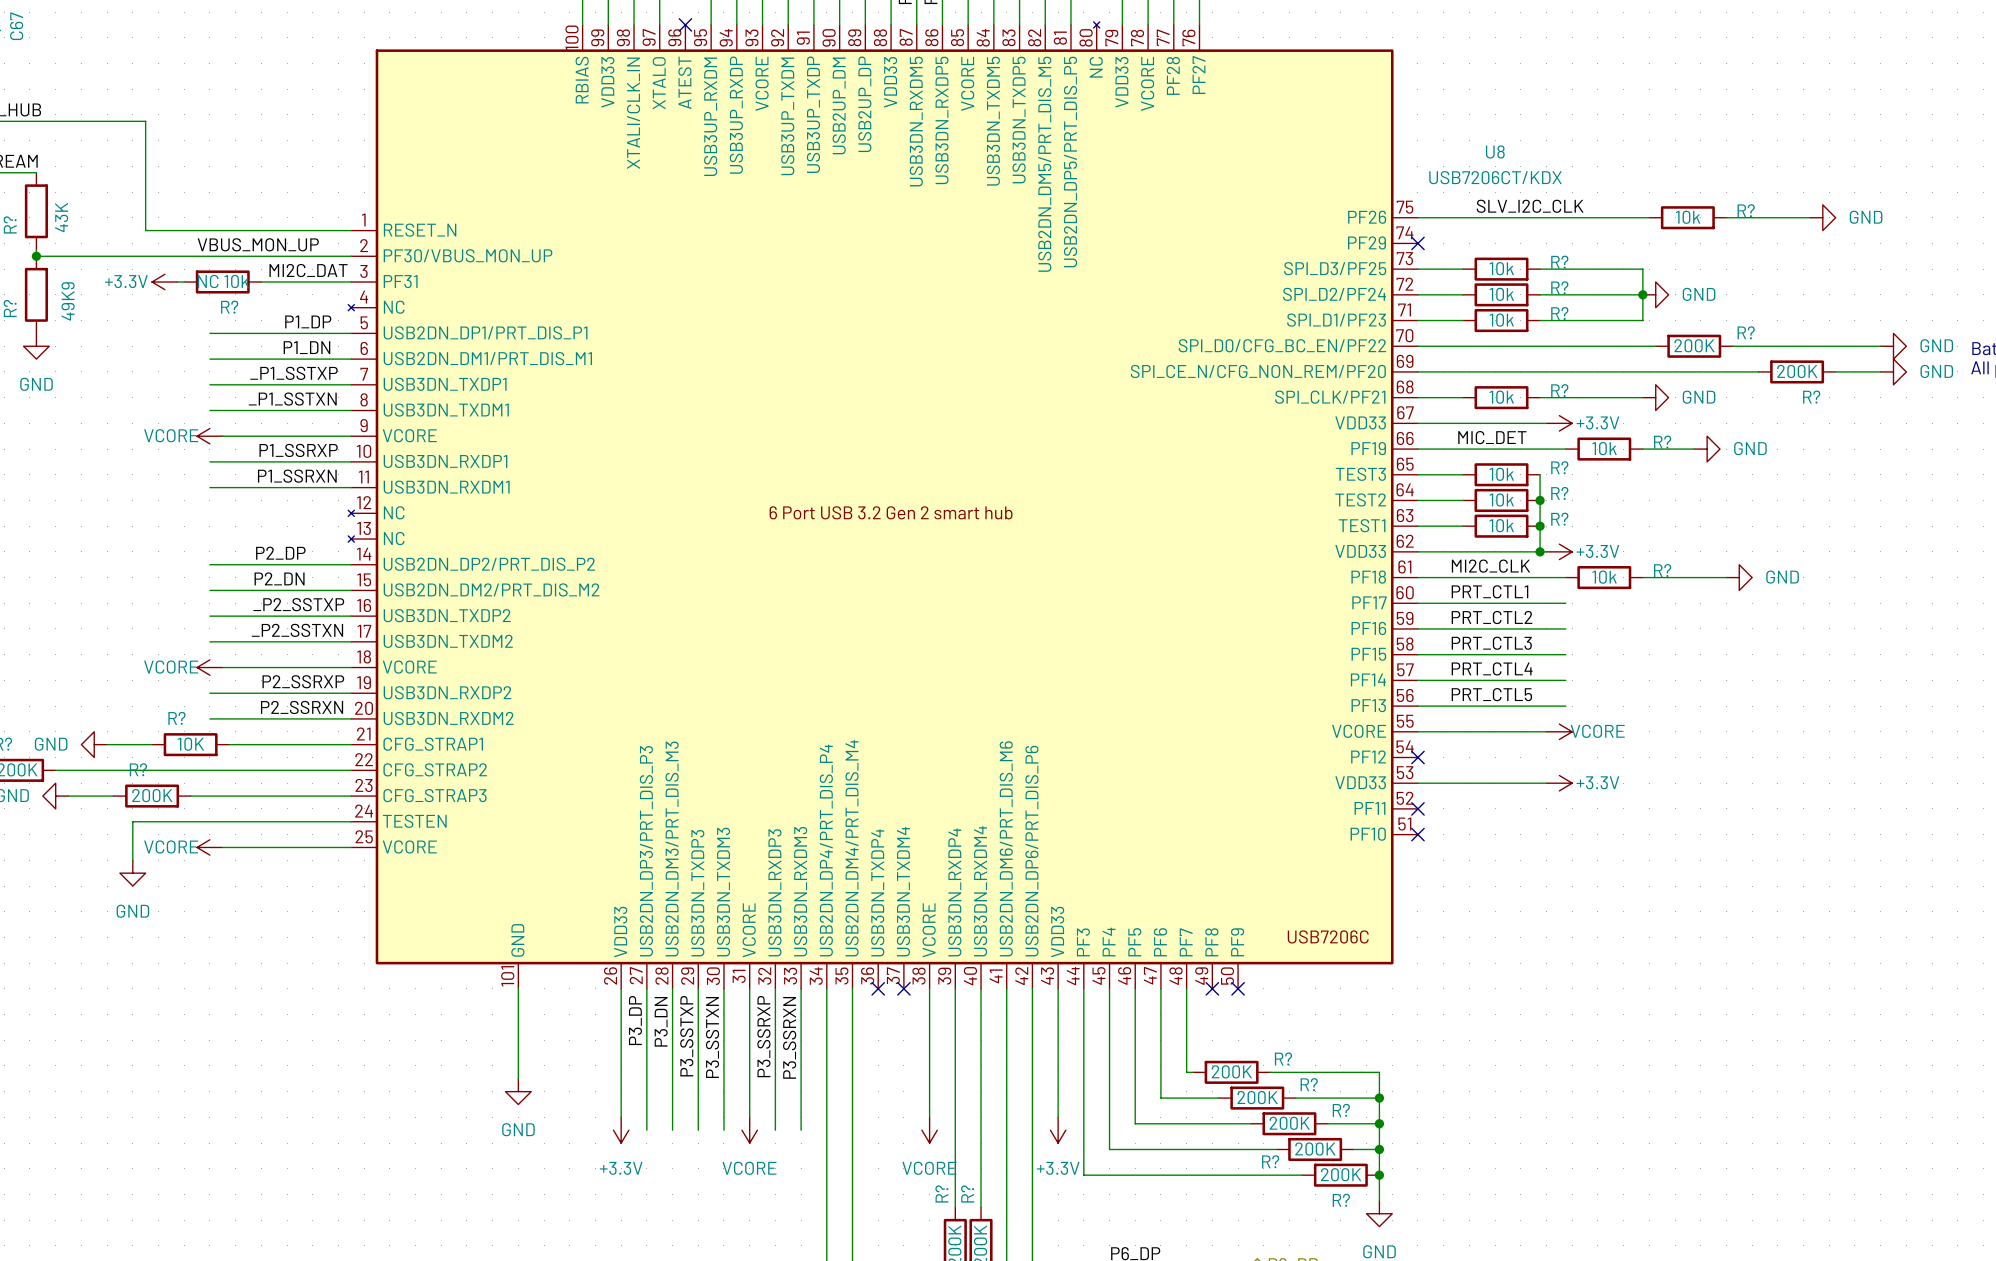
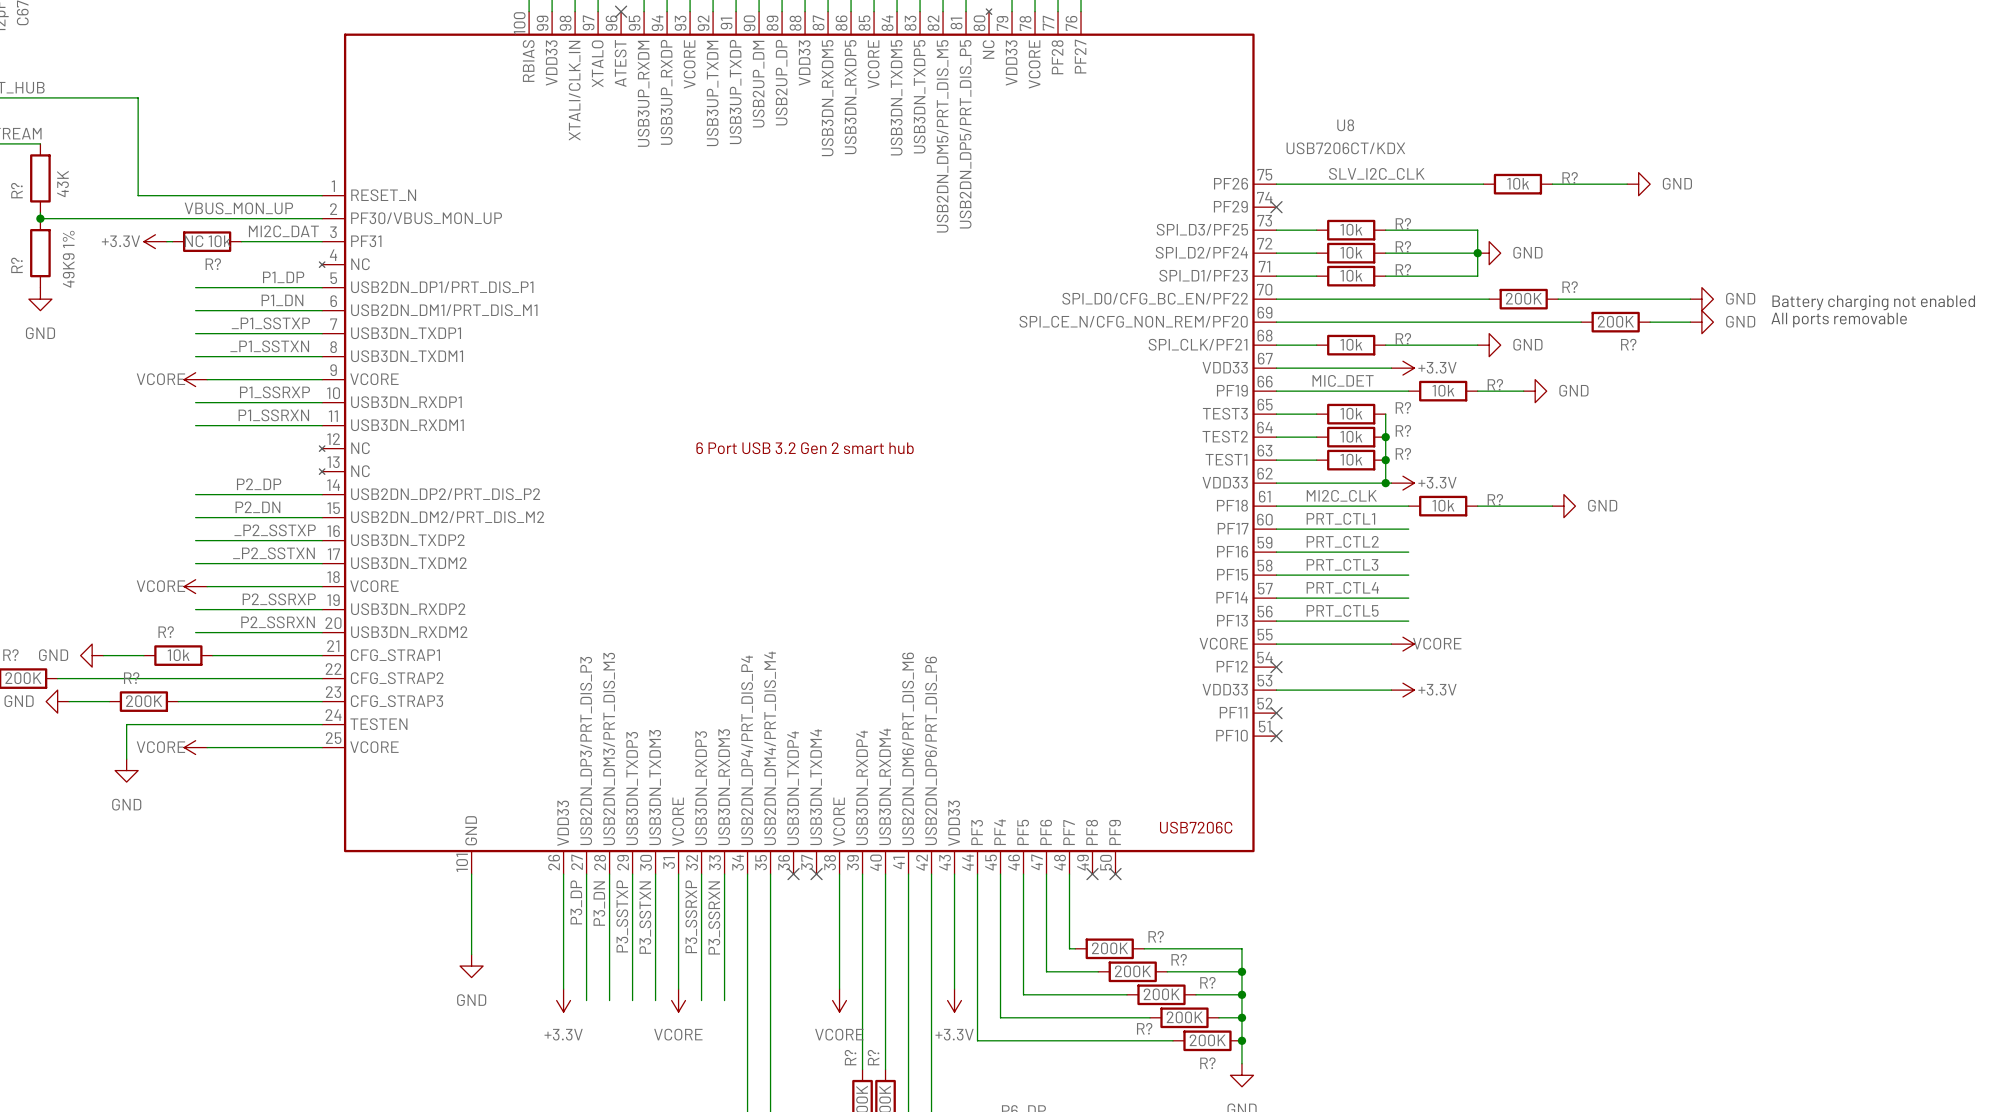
R? value: 49K9 (68, 301) -> 49K9 1% (68, 259)
R? value: 10K (190, 744) -> 10k (178, 655)

